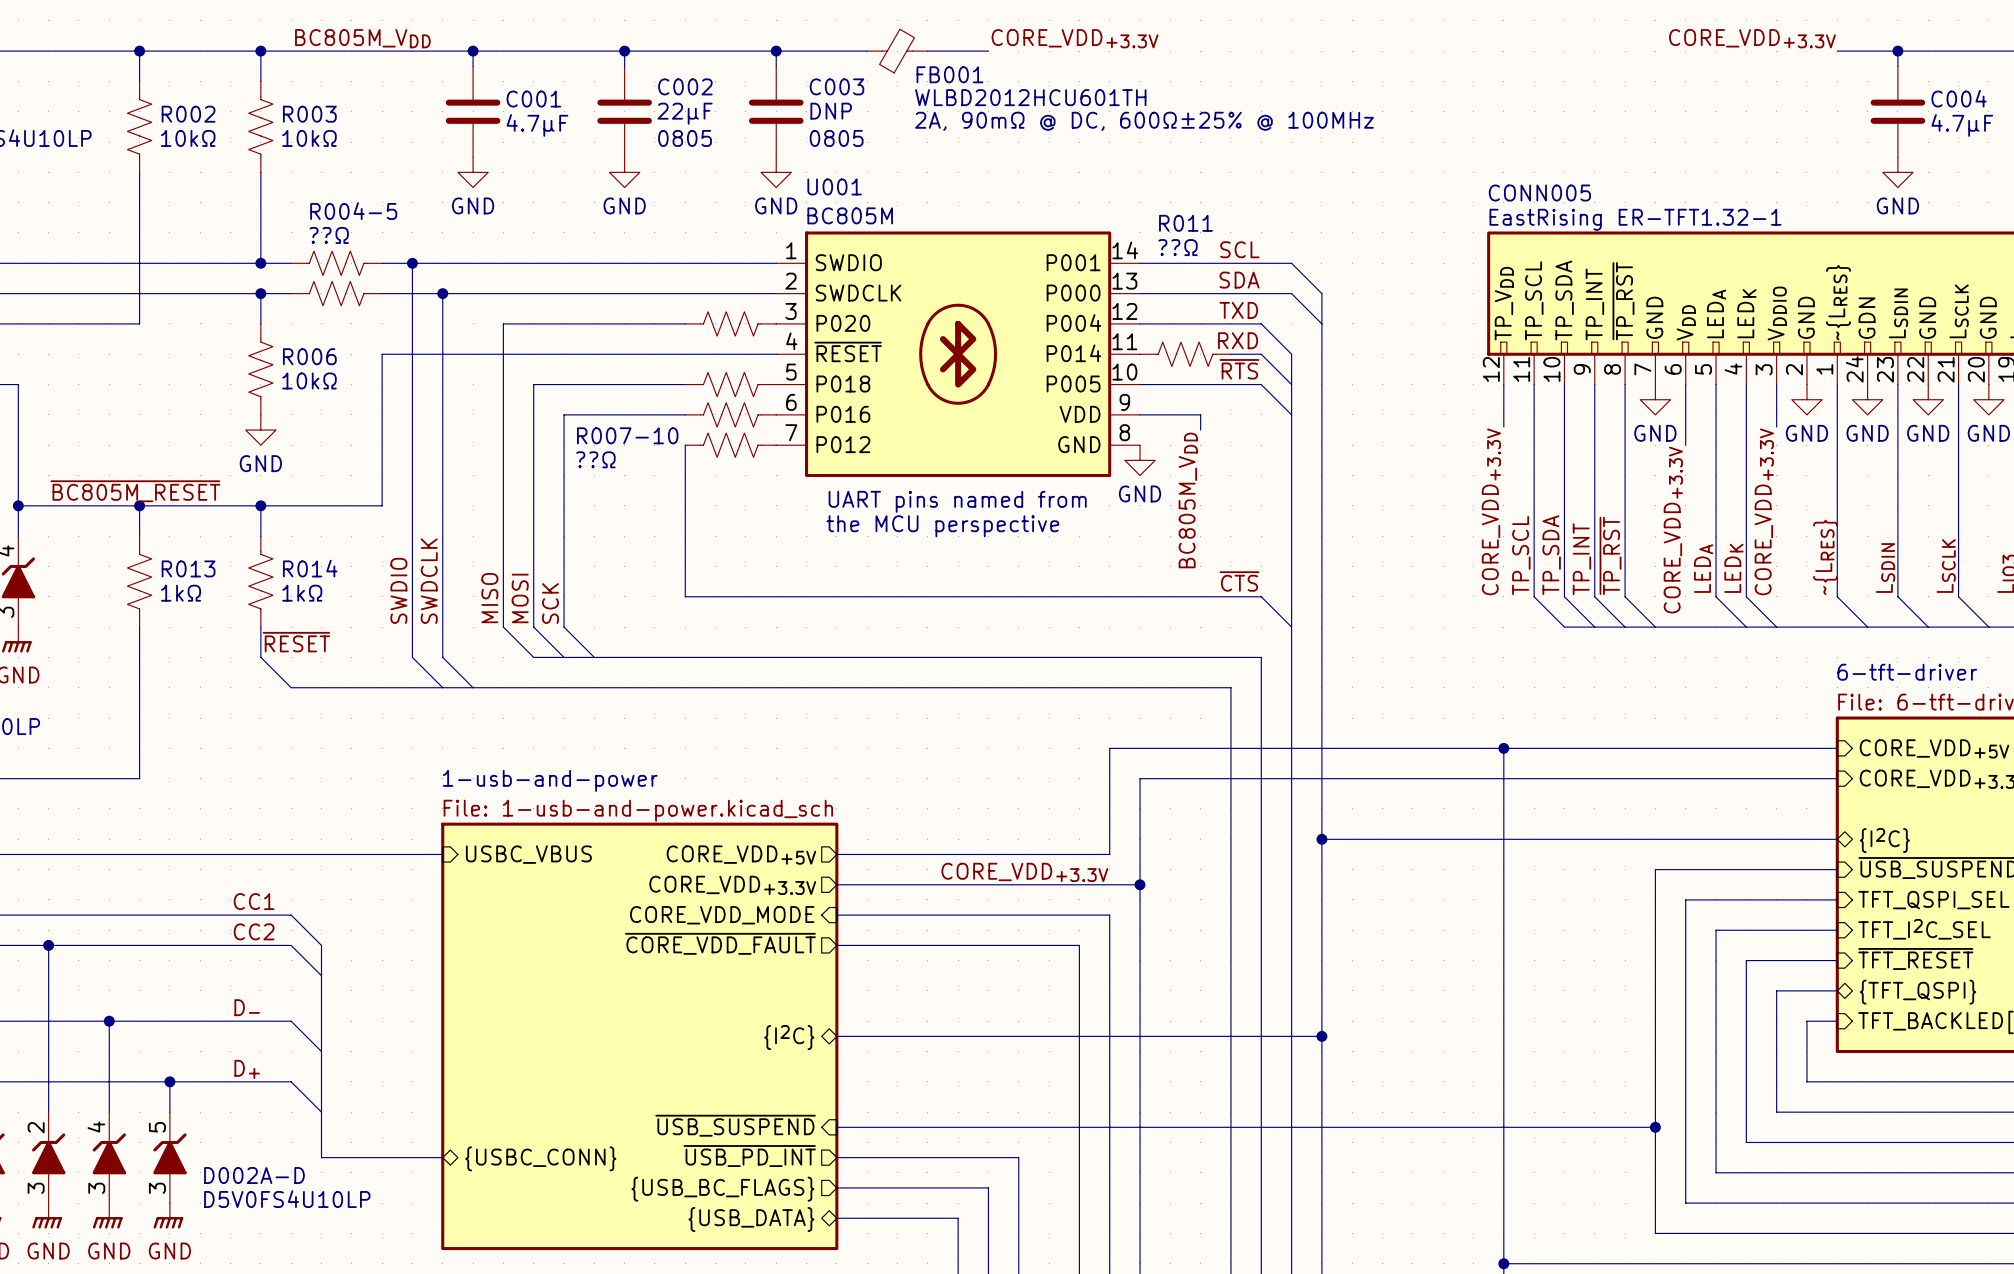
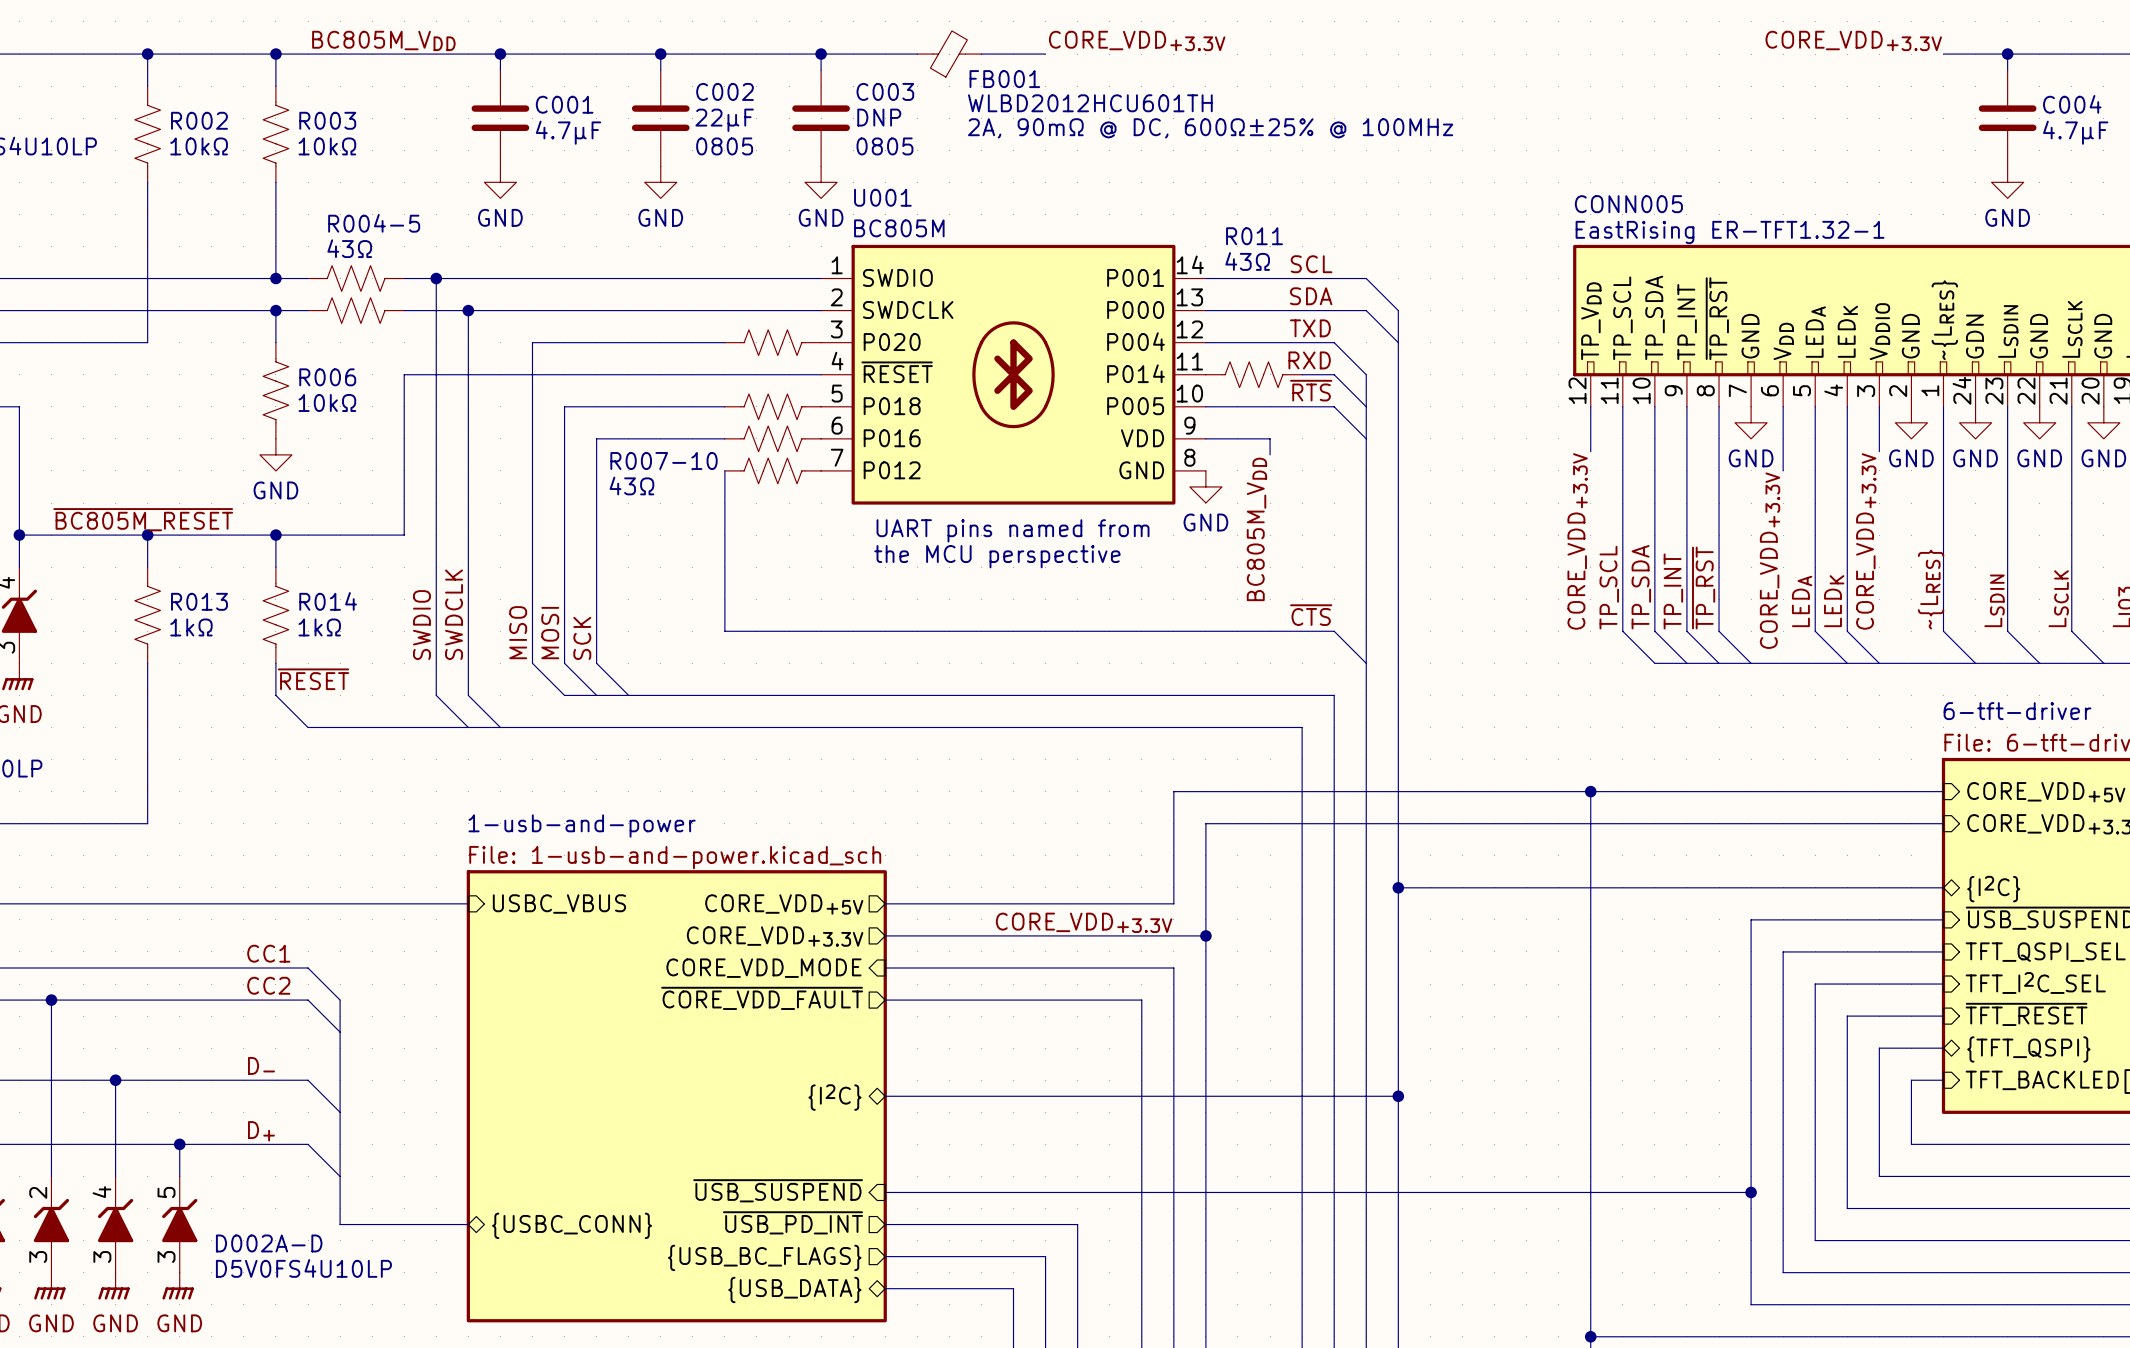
part value: ??Ω (329, 235) -> 43Ω (349, 248)
R011 value: ??Ω (1178, 247) -> 43Ω (1247, 261)
part value: ??Ω (595, 459) -> 43Ω (631, 485)

